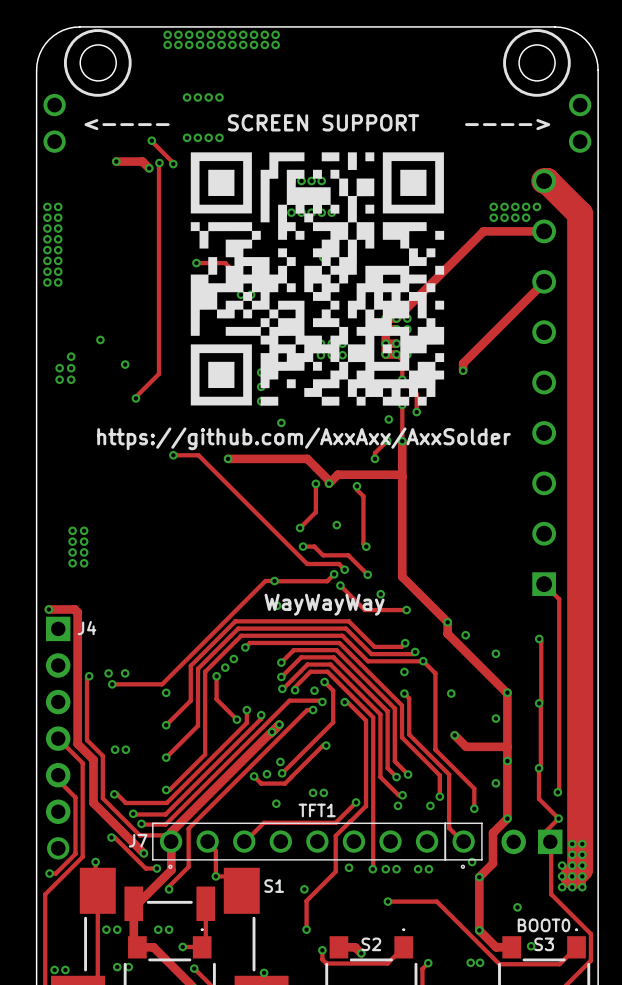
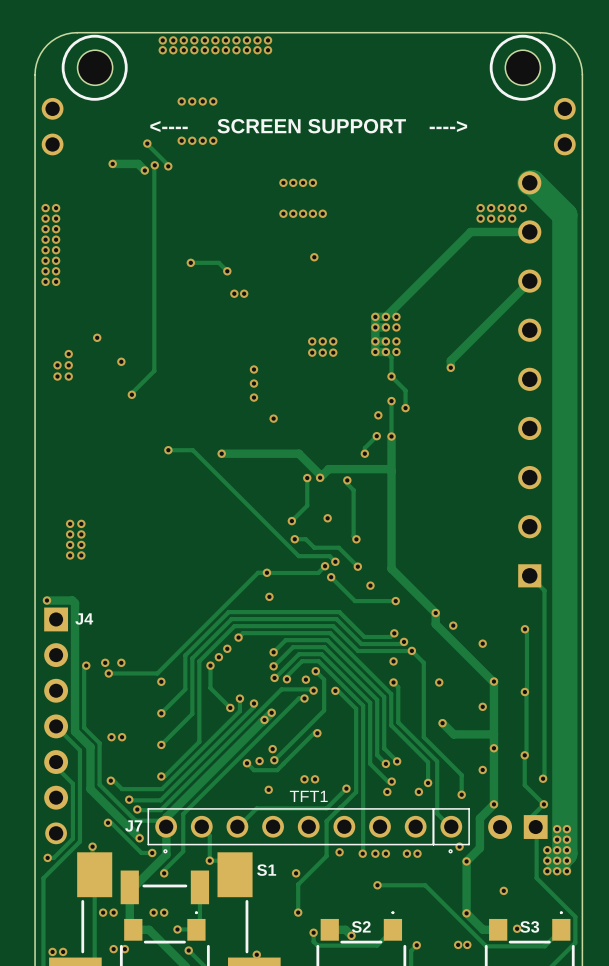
drawing: [190, 152, 445, 406] -> none
text: https://github.com/AxxAxx/AxxSolder (303, 438) -> none
text: WayWayWay (324, 604) -> none
text: BOOT0 (544, 925) -> none

